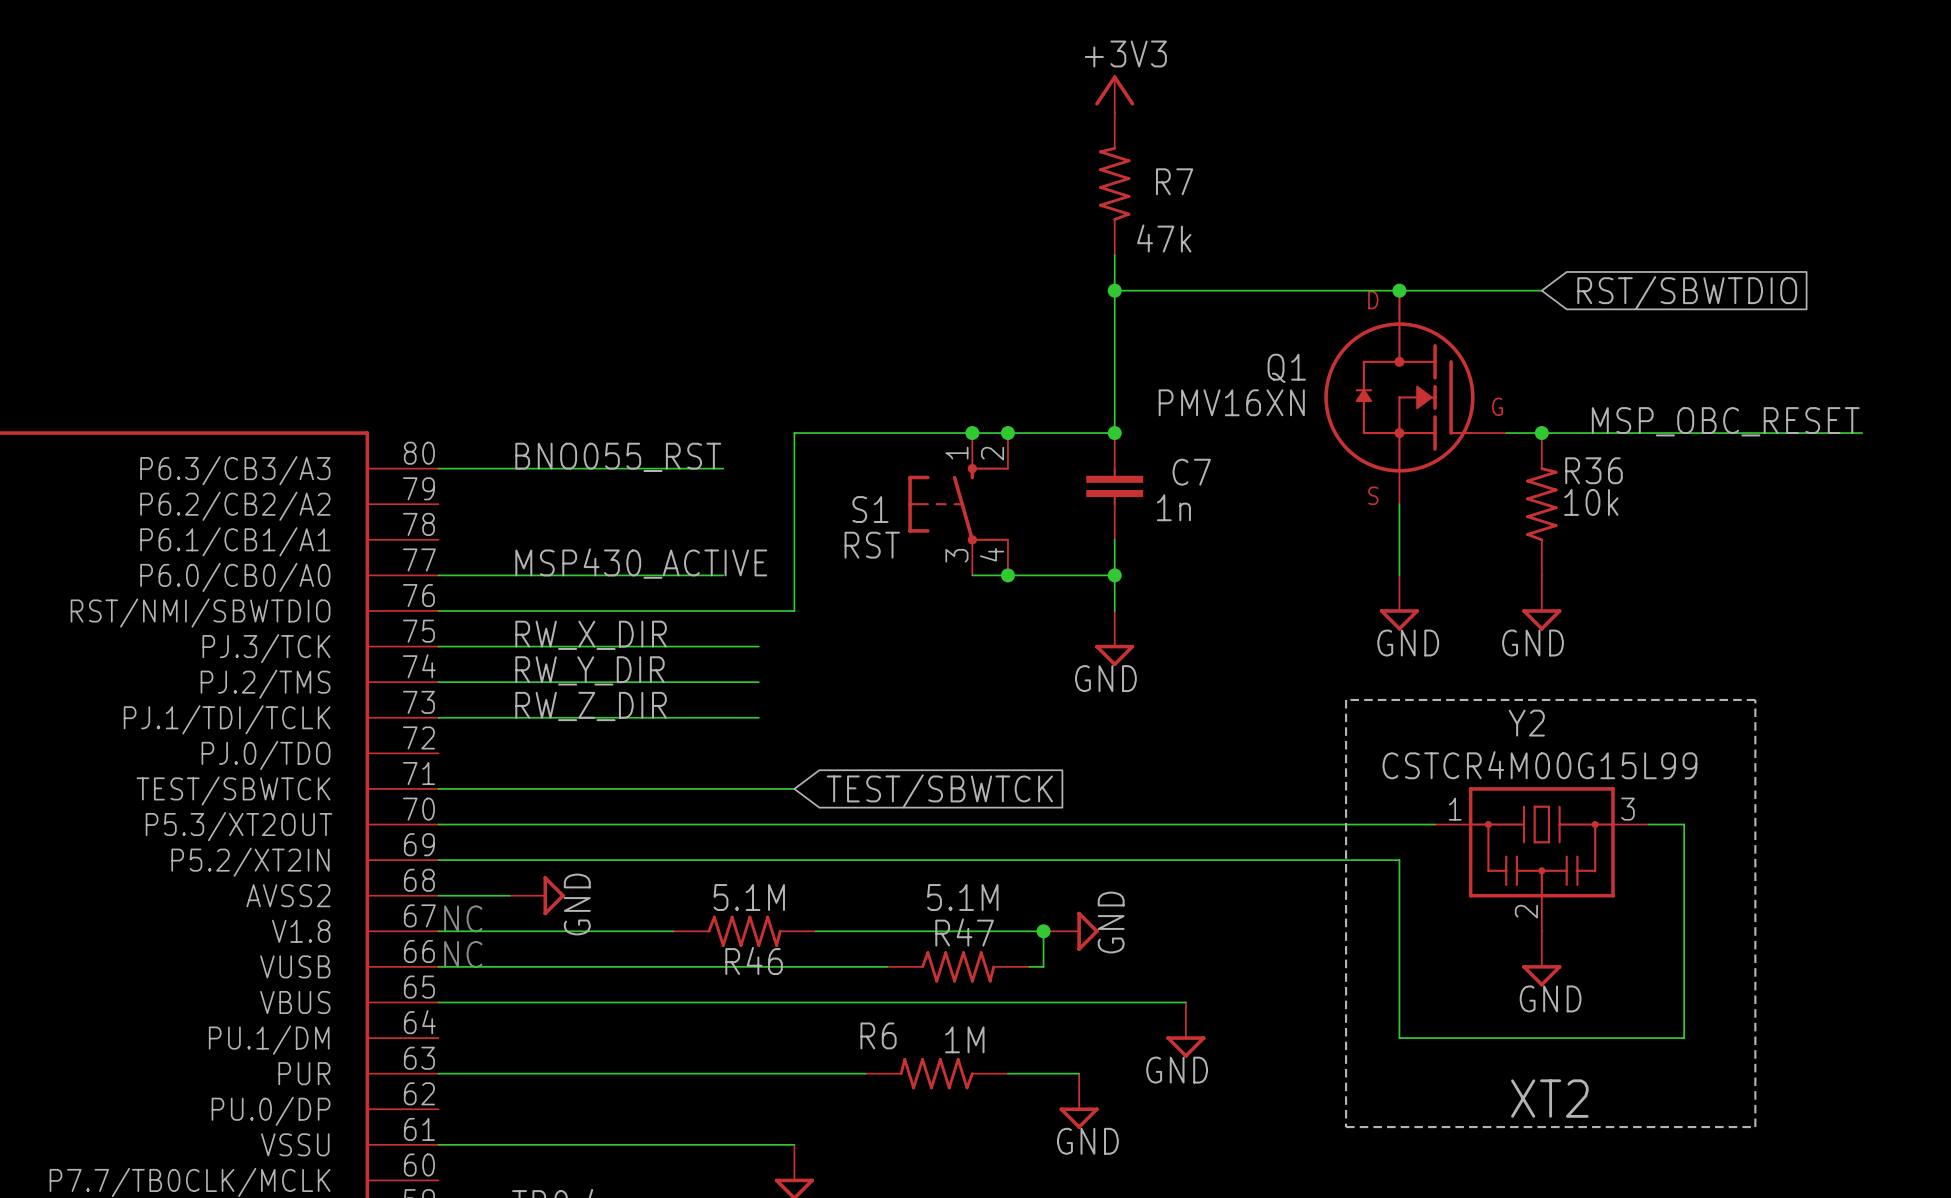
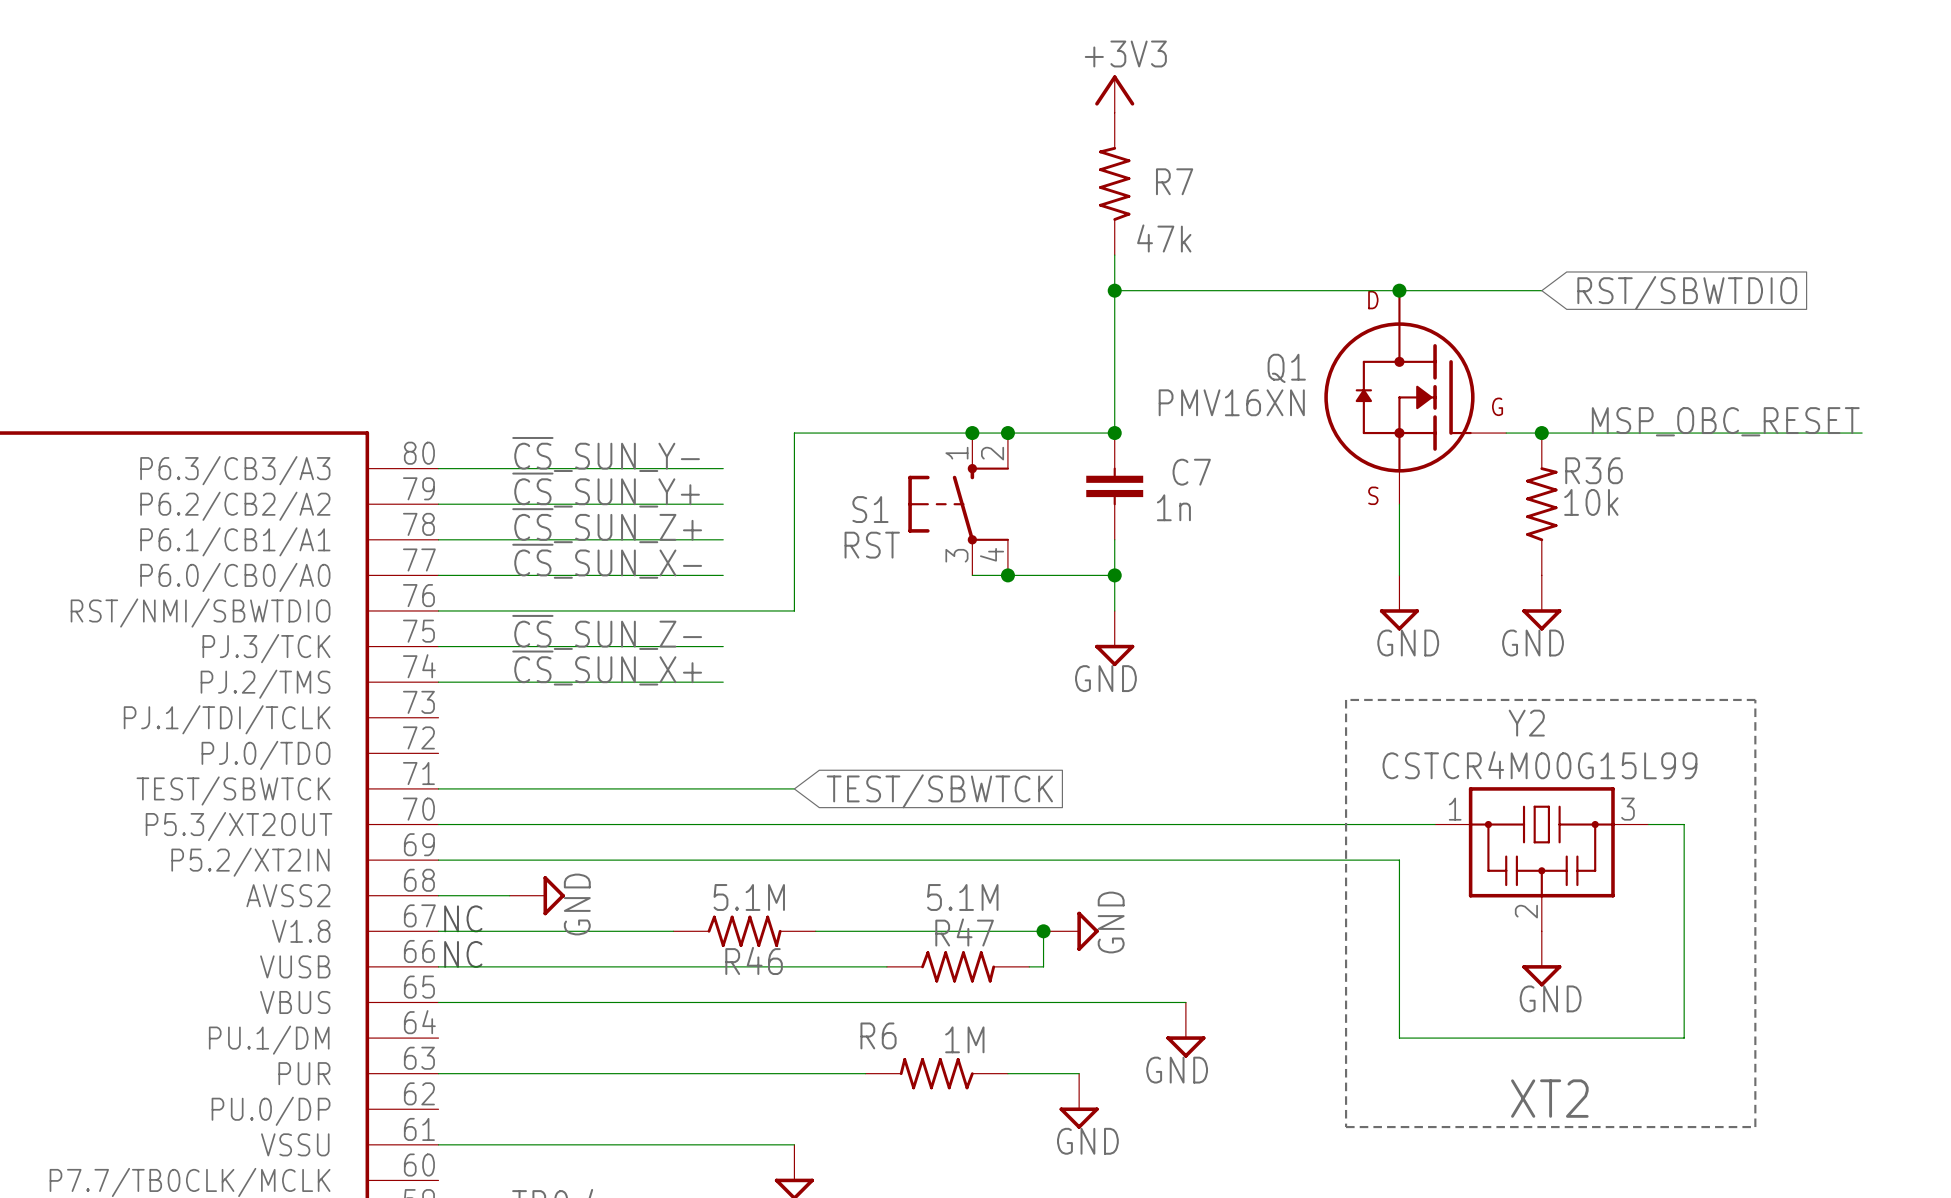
label: BNO055_RST (618, 457) -> ~{CS}_SUN_Y- (606, 454)
label: none -> ~{CS}_SUN_Y+ (606, 490)
wire: none -> (438, 504) (723, 504)
label: none -> ~{CS}_SUN_Z+ (607, 525)
wire: none -> (438, 539) (723, 539)
label: MSP430_ACTIVE (641, 563) -> ~{CS}_SUN_X- (607, 561)
label: RW_X_DIR (591, 635) -> ~{CS}_SUN_Z- (607, 632)
wire: (723, 646) (758, 646) -> none
label: RW_Y_DIR (590, 670) -> ~{CS}_SUN_X+ (607, 668)
wire: (723, 682) (758, 682) -> none
label: RW_Z_DIR (591, 706) -> none
wire: (438, 717) (758, 717) -> none

